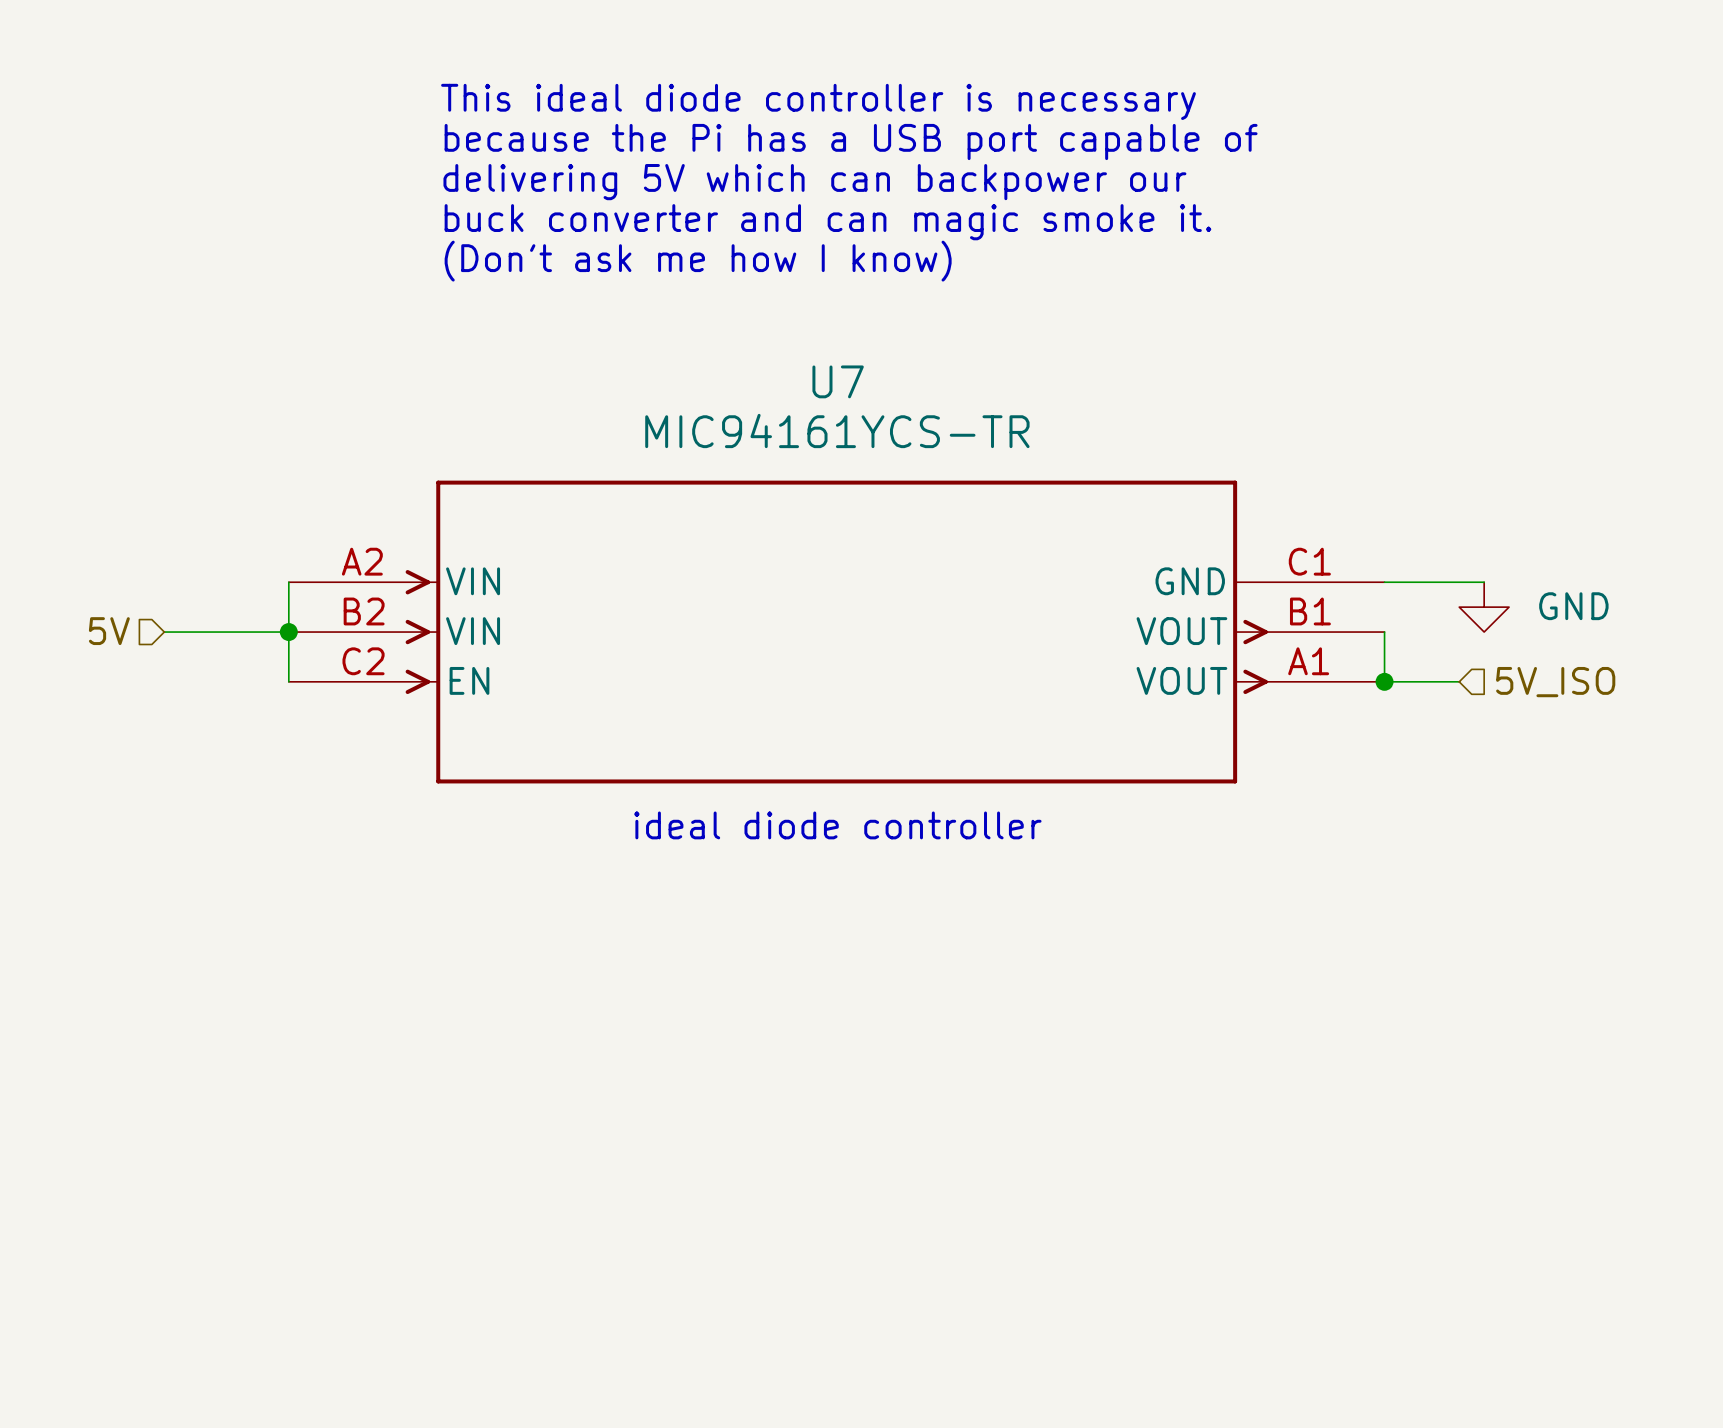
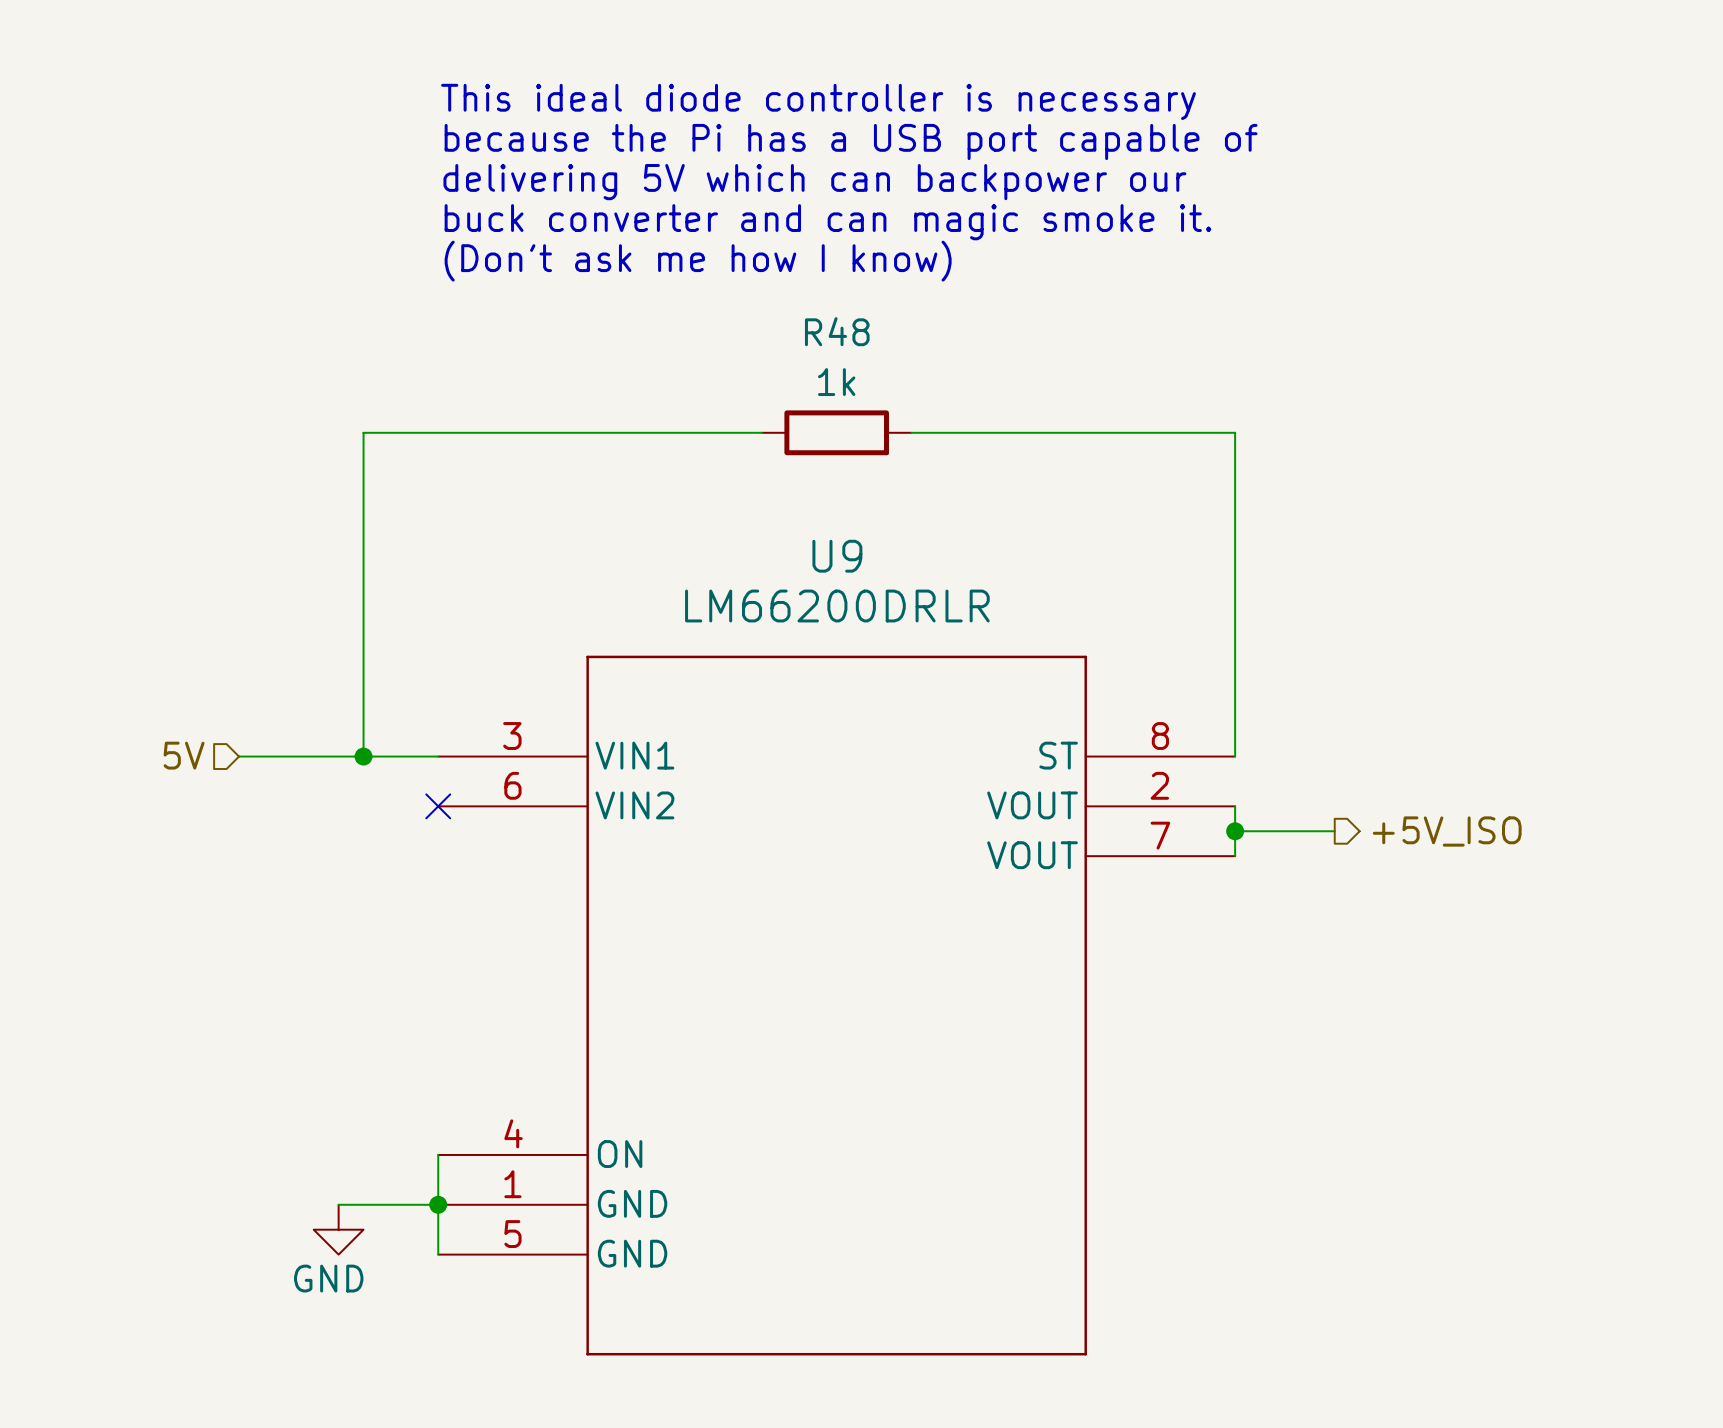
wire: none -> (761, 432) (363, 432) (363, 756)
R48: none -> 1k (836, 432)
wire: none -> (911, 432) (1235, 432) (1235, 756)
wire: (288, 582) (288, 681) -> none
wire: (1384, 582) (1484, 582) -> (1235, 831) (1334, 831)
power symbol: GND (1484, 607) -> none
hierarchical label position: 5V (109, 631) -> 5V (184, 755)
wire: (164, 632) (288, 632) -> none
junction: (288, 632) -> none
U7: MIC94161YCS-TR (836, 632) -> none
wire: (1384, 632) (1384, 681) (1459, 681) -> none
junction: (1384, 681) -> none
hierarchical label: 5V_ISO (1555, 682) -> none
wire: none -> (239, 756) (438, 756)
junction: none -> (363, 756)
no-connect mark: none -> (438, 806)
wire: none -> (1235, 806) (1235, 856)
text: ideal diode controller (837, 825) -> none
junction: none -> (1235, 831)
hierarchical label: none -> +5V_ISO (1447, 831)
U9: none -> LM66200DRLR (836, 1005)
wire: none -> (438, 1154) (438, 1254)
wire: none -> (338, 1204) (438, 1204)
junction: none -> (438, 1204)
power symbol: none -> GND (338, 1229)

